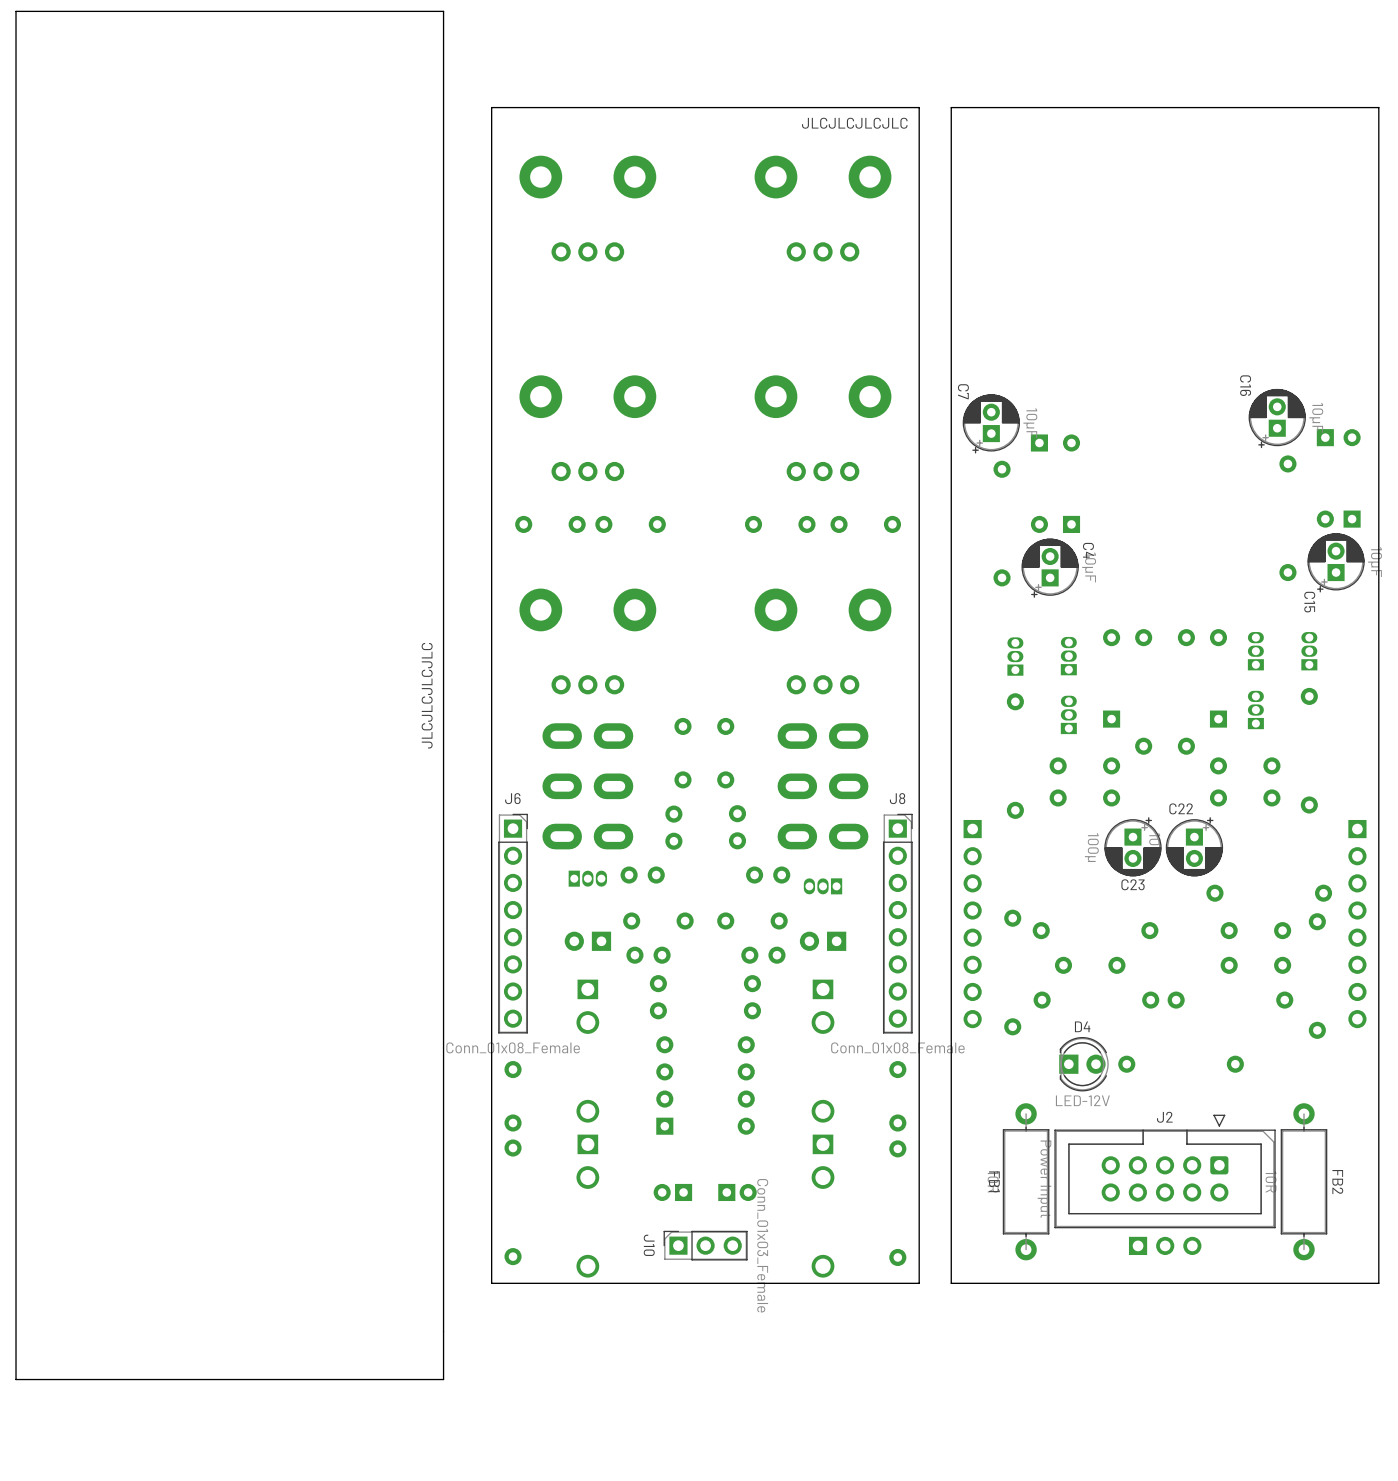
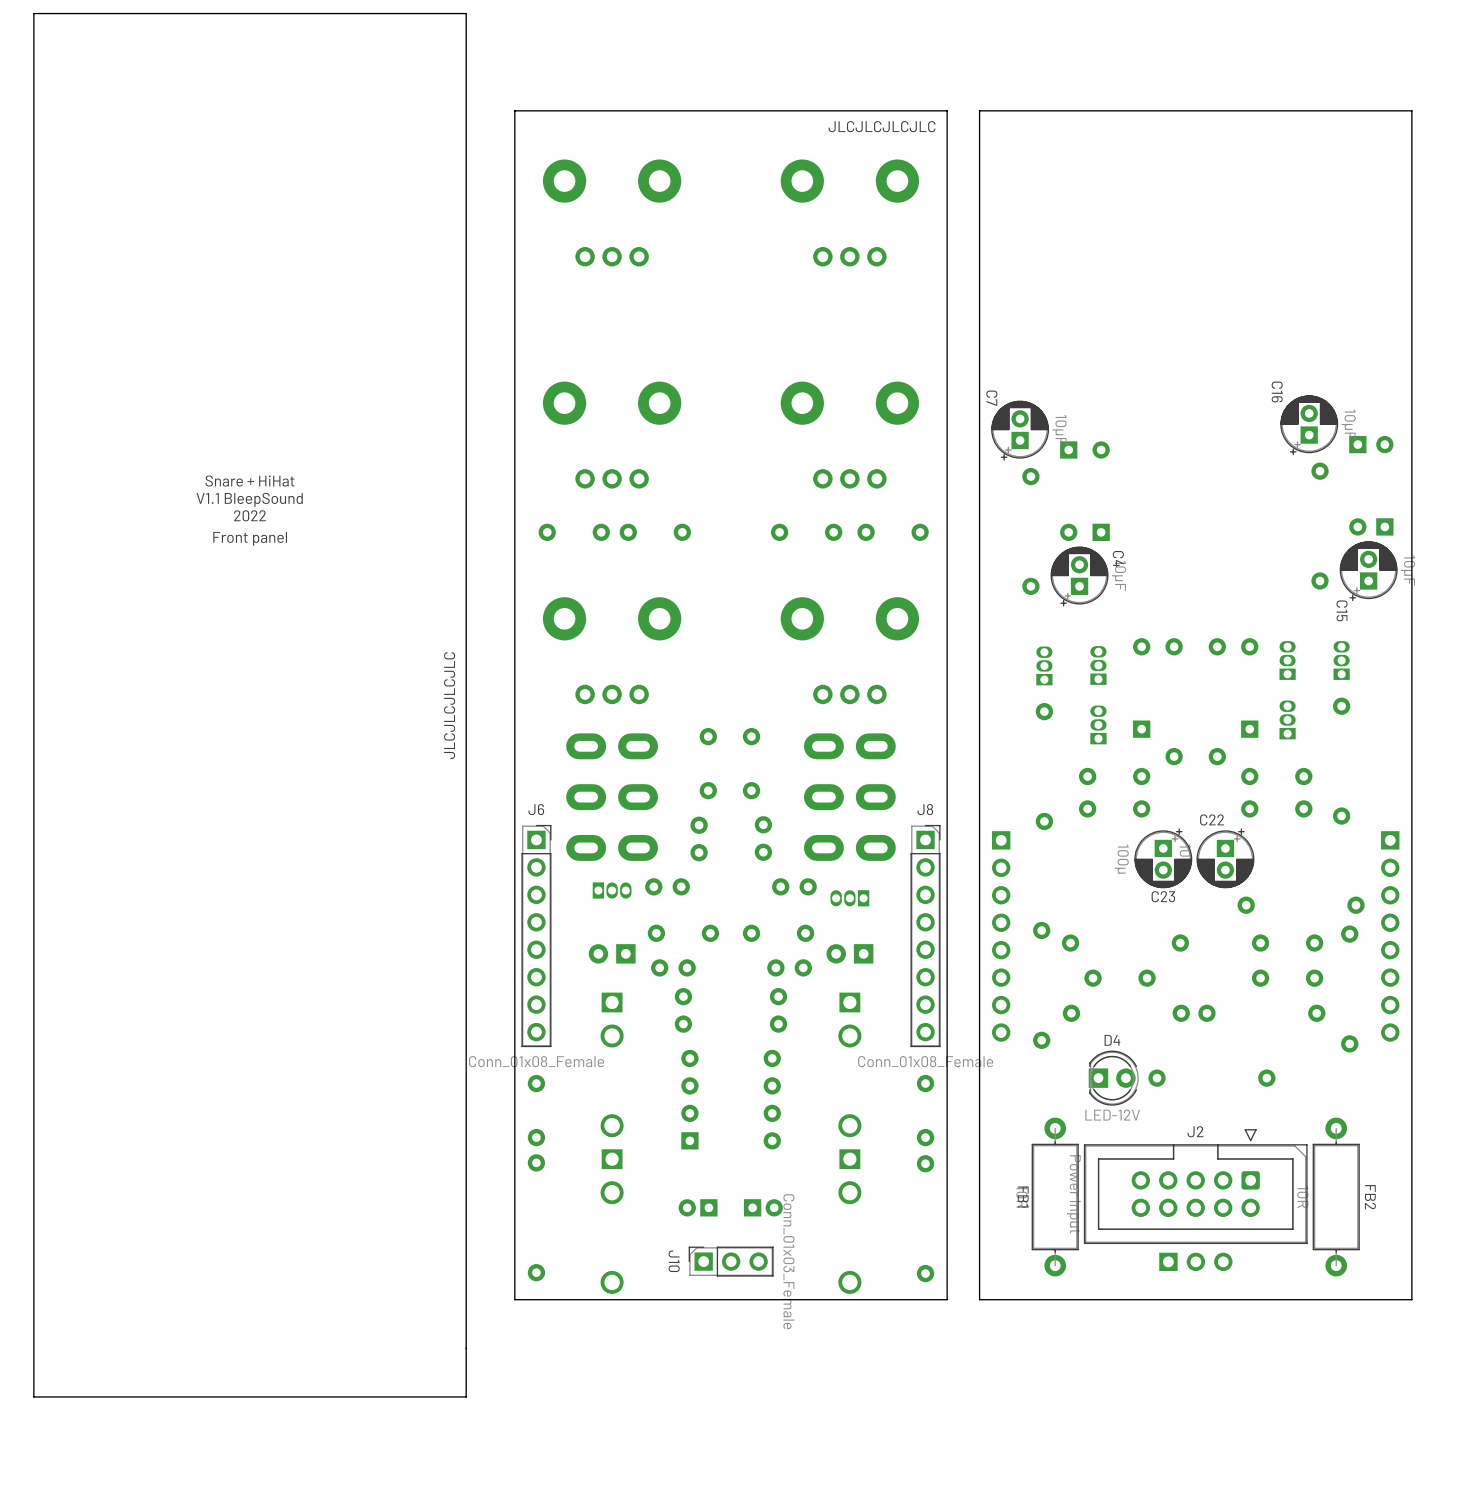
text: none -> Snare + HiHat (249, 481)
text: none -> V1.1 BleepSound (249, 499)
text: none -> 2022 (250, 515)
text: none -> Front panel (250, 538)

